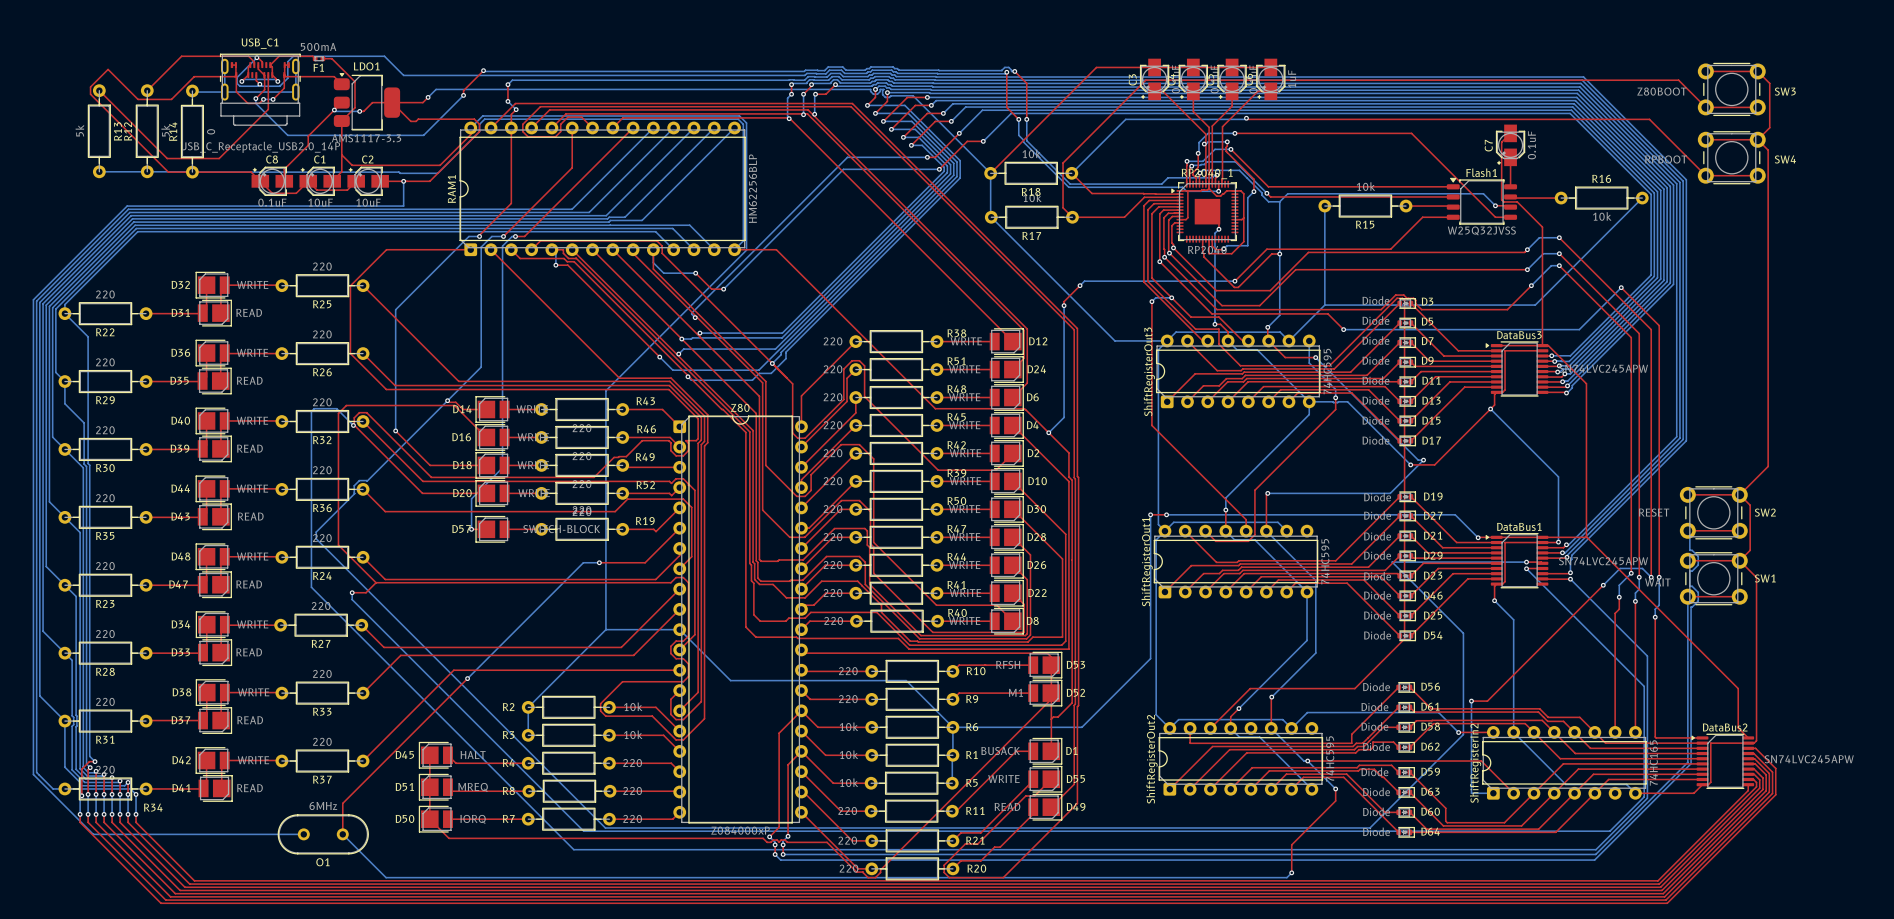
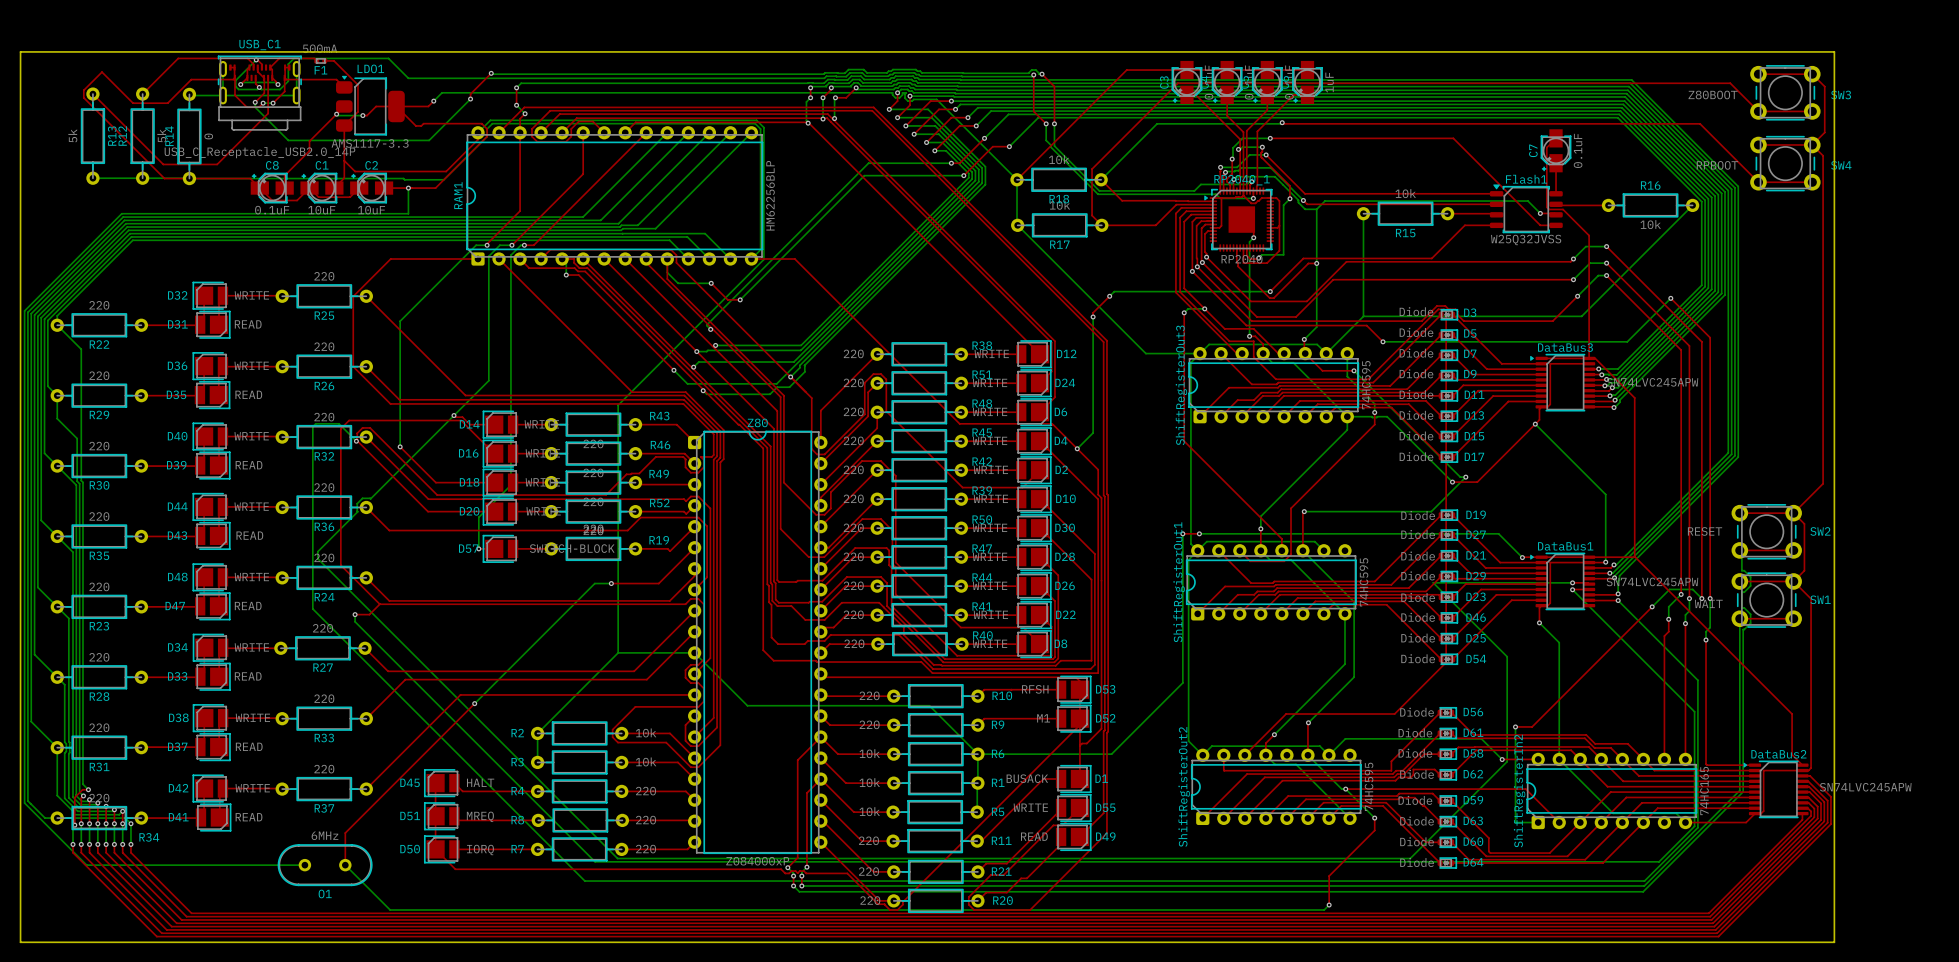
board edge: none -> (20, 51) (1834, 51) (1834, 942) (20, 942) (20, 51)

